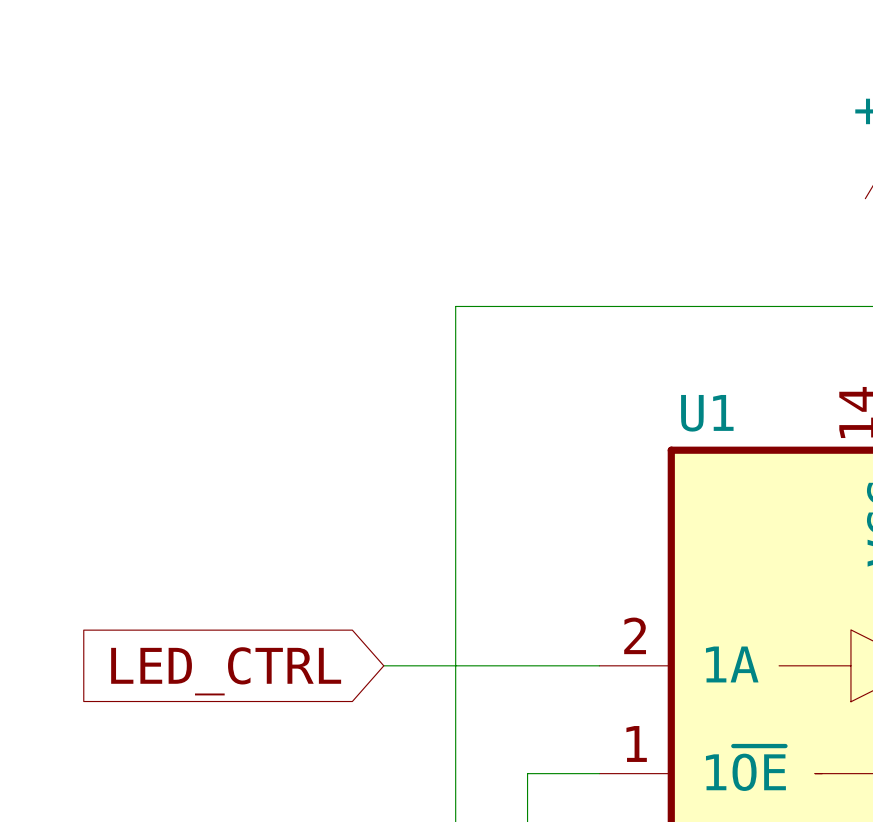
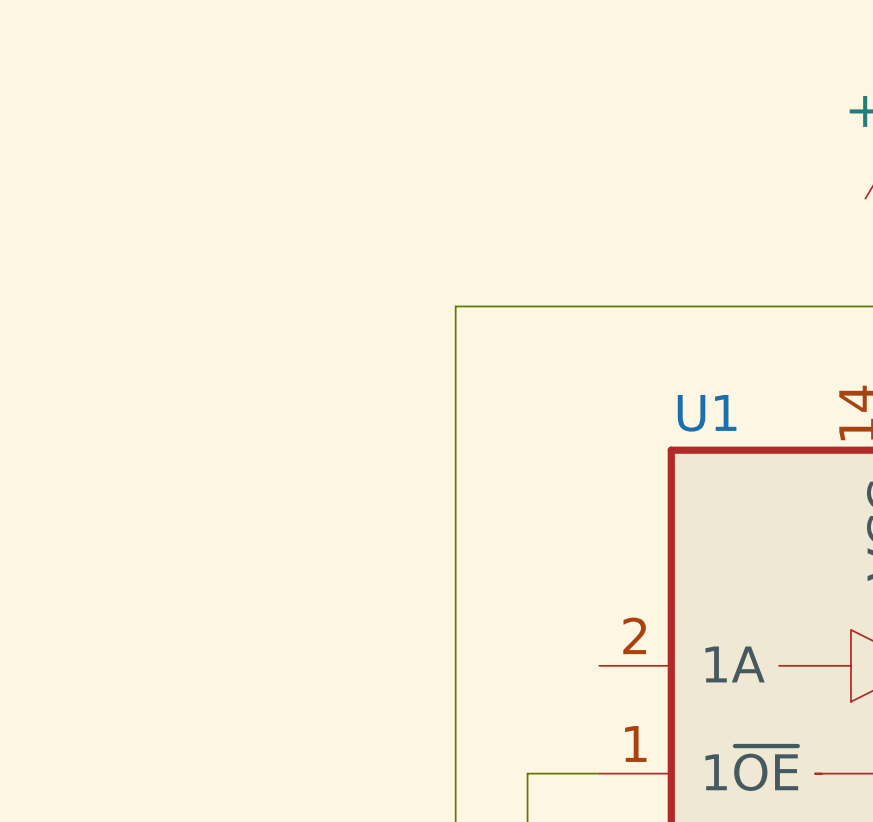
wire: (383, 665) (599, 665) -> none
global label: LED_CTRL (226, 671) -> none

